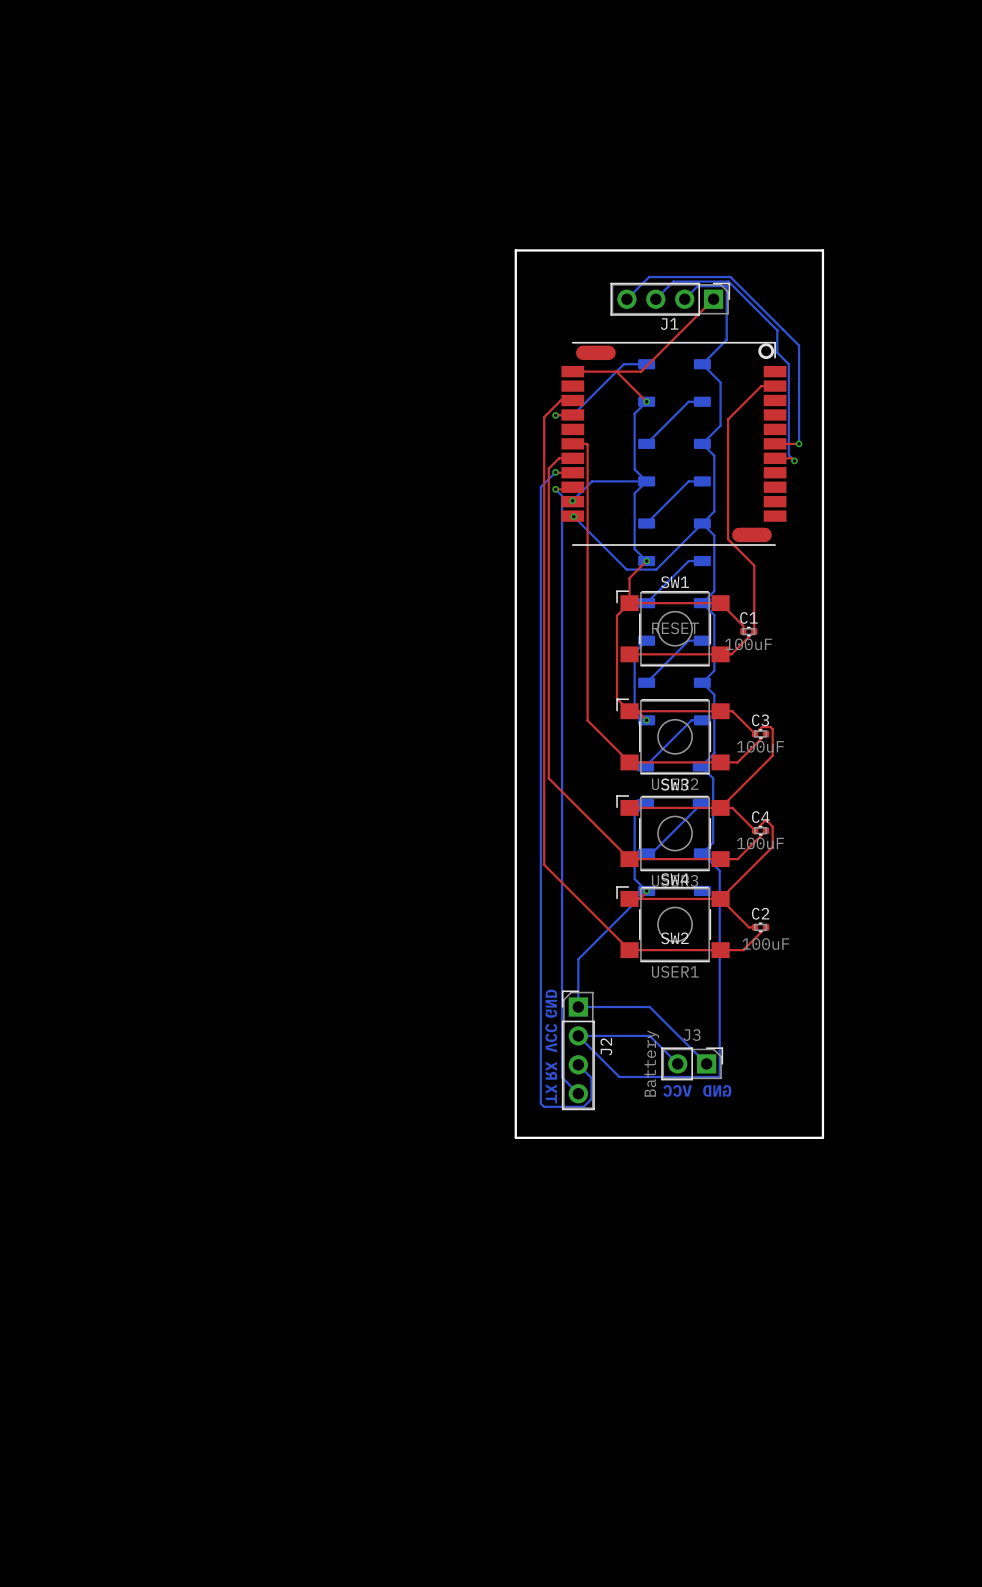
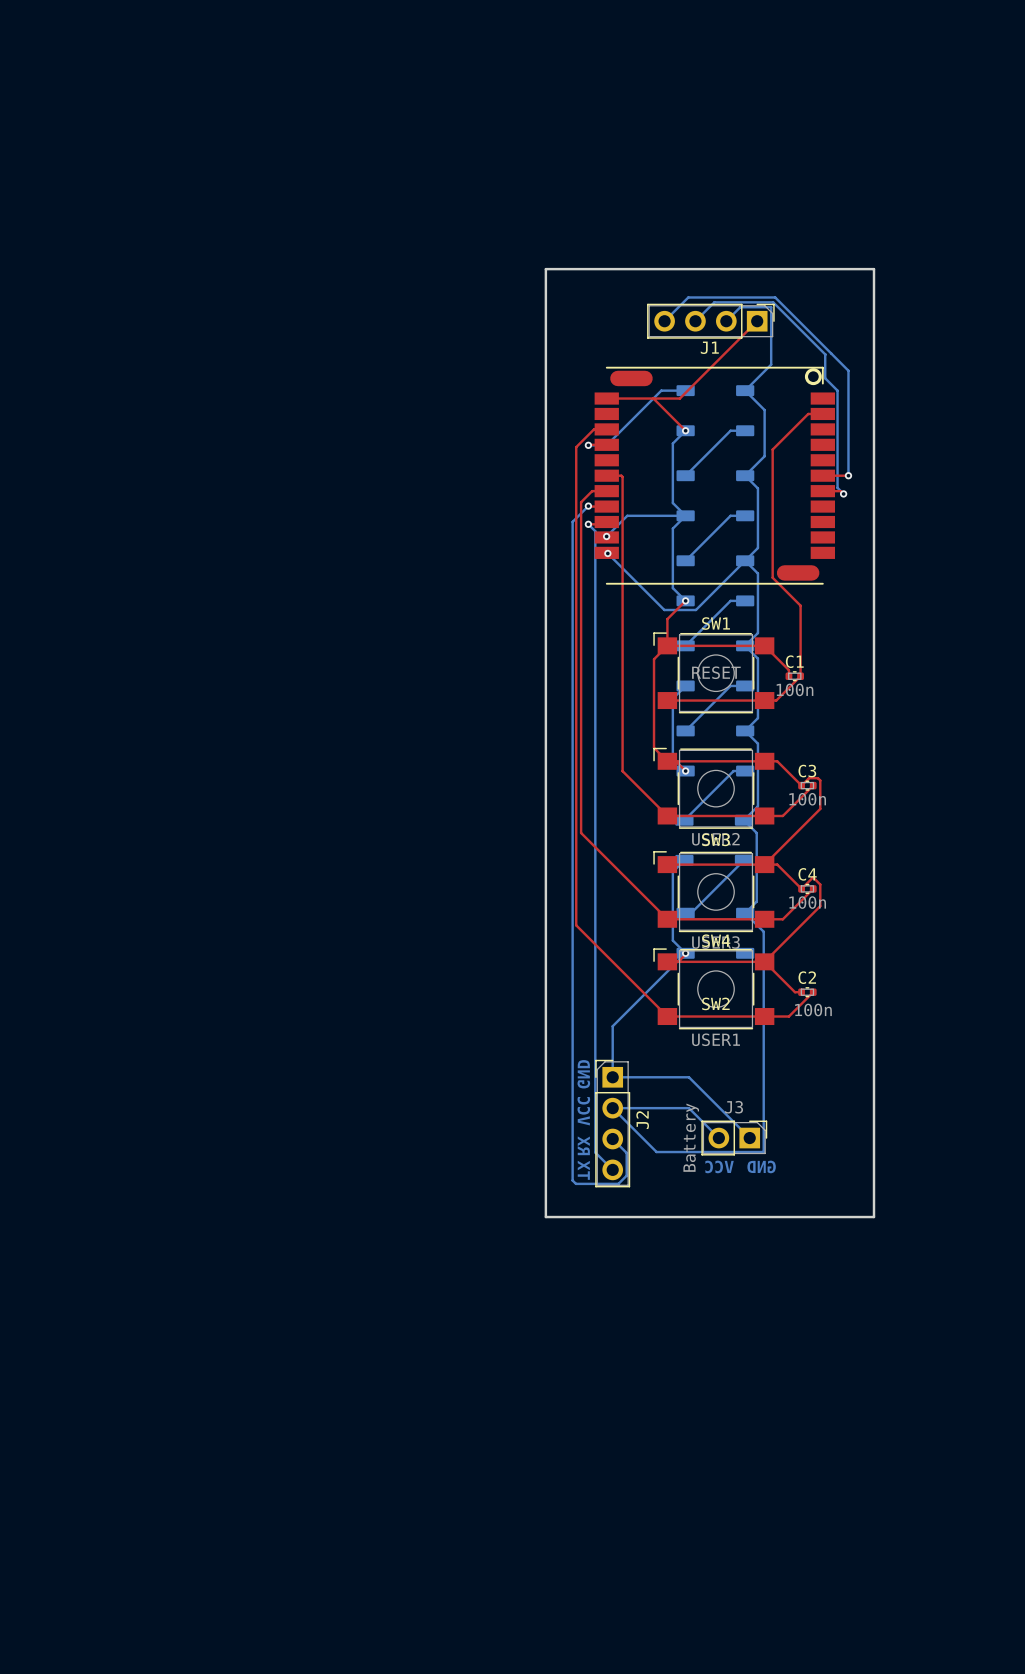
C1 value: 100uF (748, 644) -> 100n (795, 689)
C3 value: 100uF (760, 746) -> 100n (807, 799)
C4 value: 100uF (760, 843) -> 100n (807, 902)
C2 value: 100uF (765, 944) -> 100n (813, 1009)

